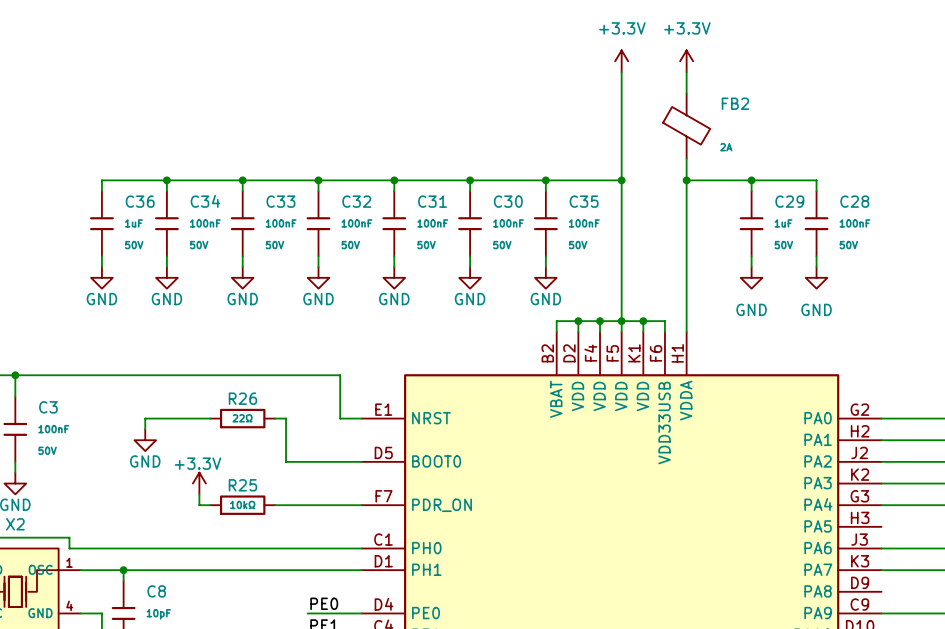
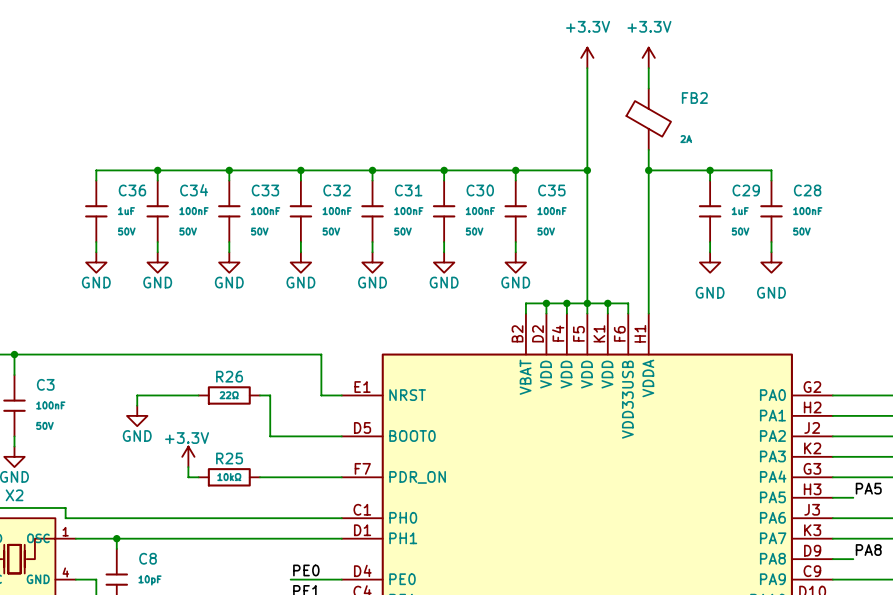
label: none -> PA5 (868, 488)
wire: none -> (832, 497) (853, 497)
label: none -> PA8 (868, 550)
wire: none -> (832, 559) (853, 559)

